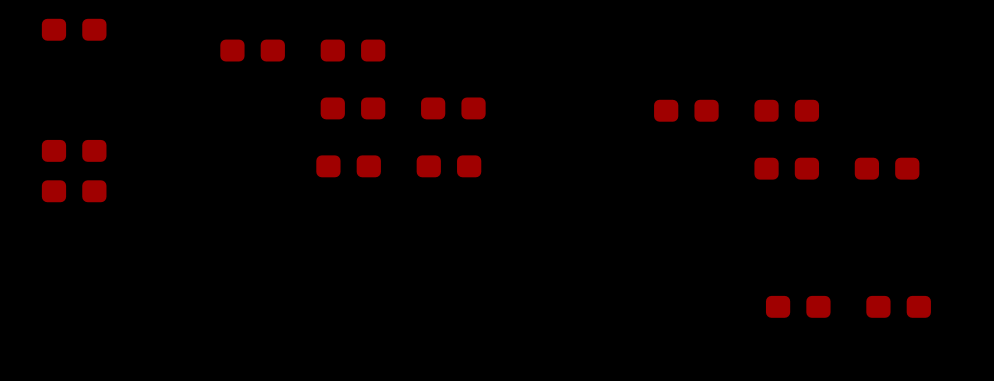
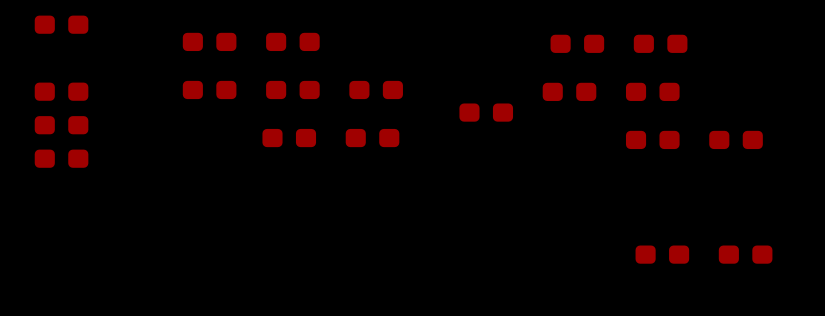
part: none -> (577, 43)
part: none -> (660, 43)
part: none -> (209, 89)
part: none -> (61, 91)
part: none -> (486, 112)

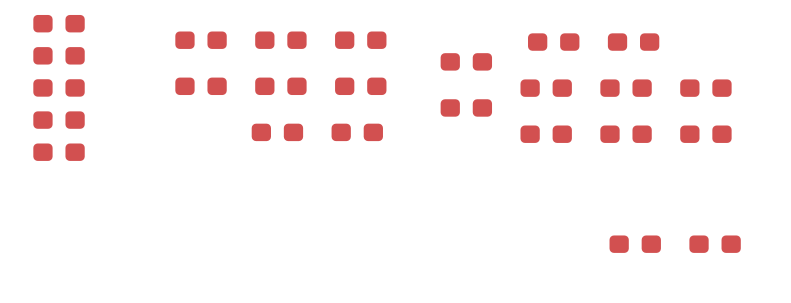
part: none -> (360, 40)
part: none -> (59, 55)
part: none -> (466, 61)
part: none -> (705, 88)
part: none -> (546, 134)

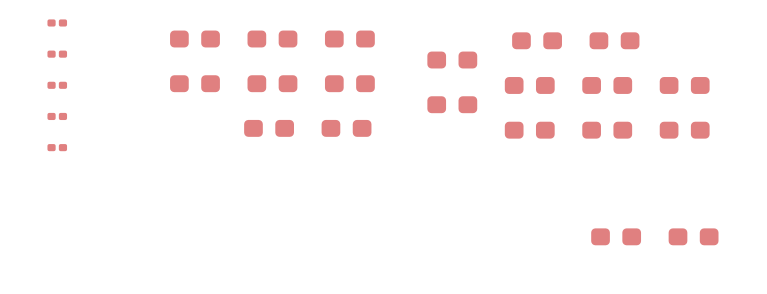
part footprint: [33, 14, 85, 33] -> [47, 19, 68, 27]
part footprint: [33, 47, 85, 65] -> [47, 50, 68, 58]
part footprint: [33, 79, 85, 97] -> [47, 81, 68, 89]
part footprint: [33, 111, 85, 129] -> [47, 112, 68, 121]
part footprint: [33, 143, 85, 161] -> [47, 144, 68, 152]

